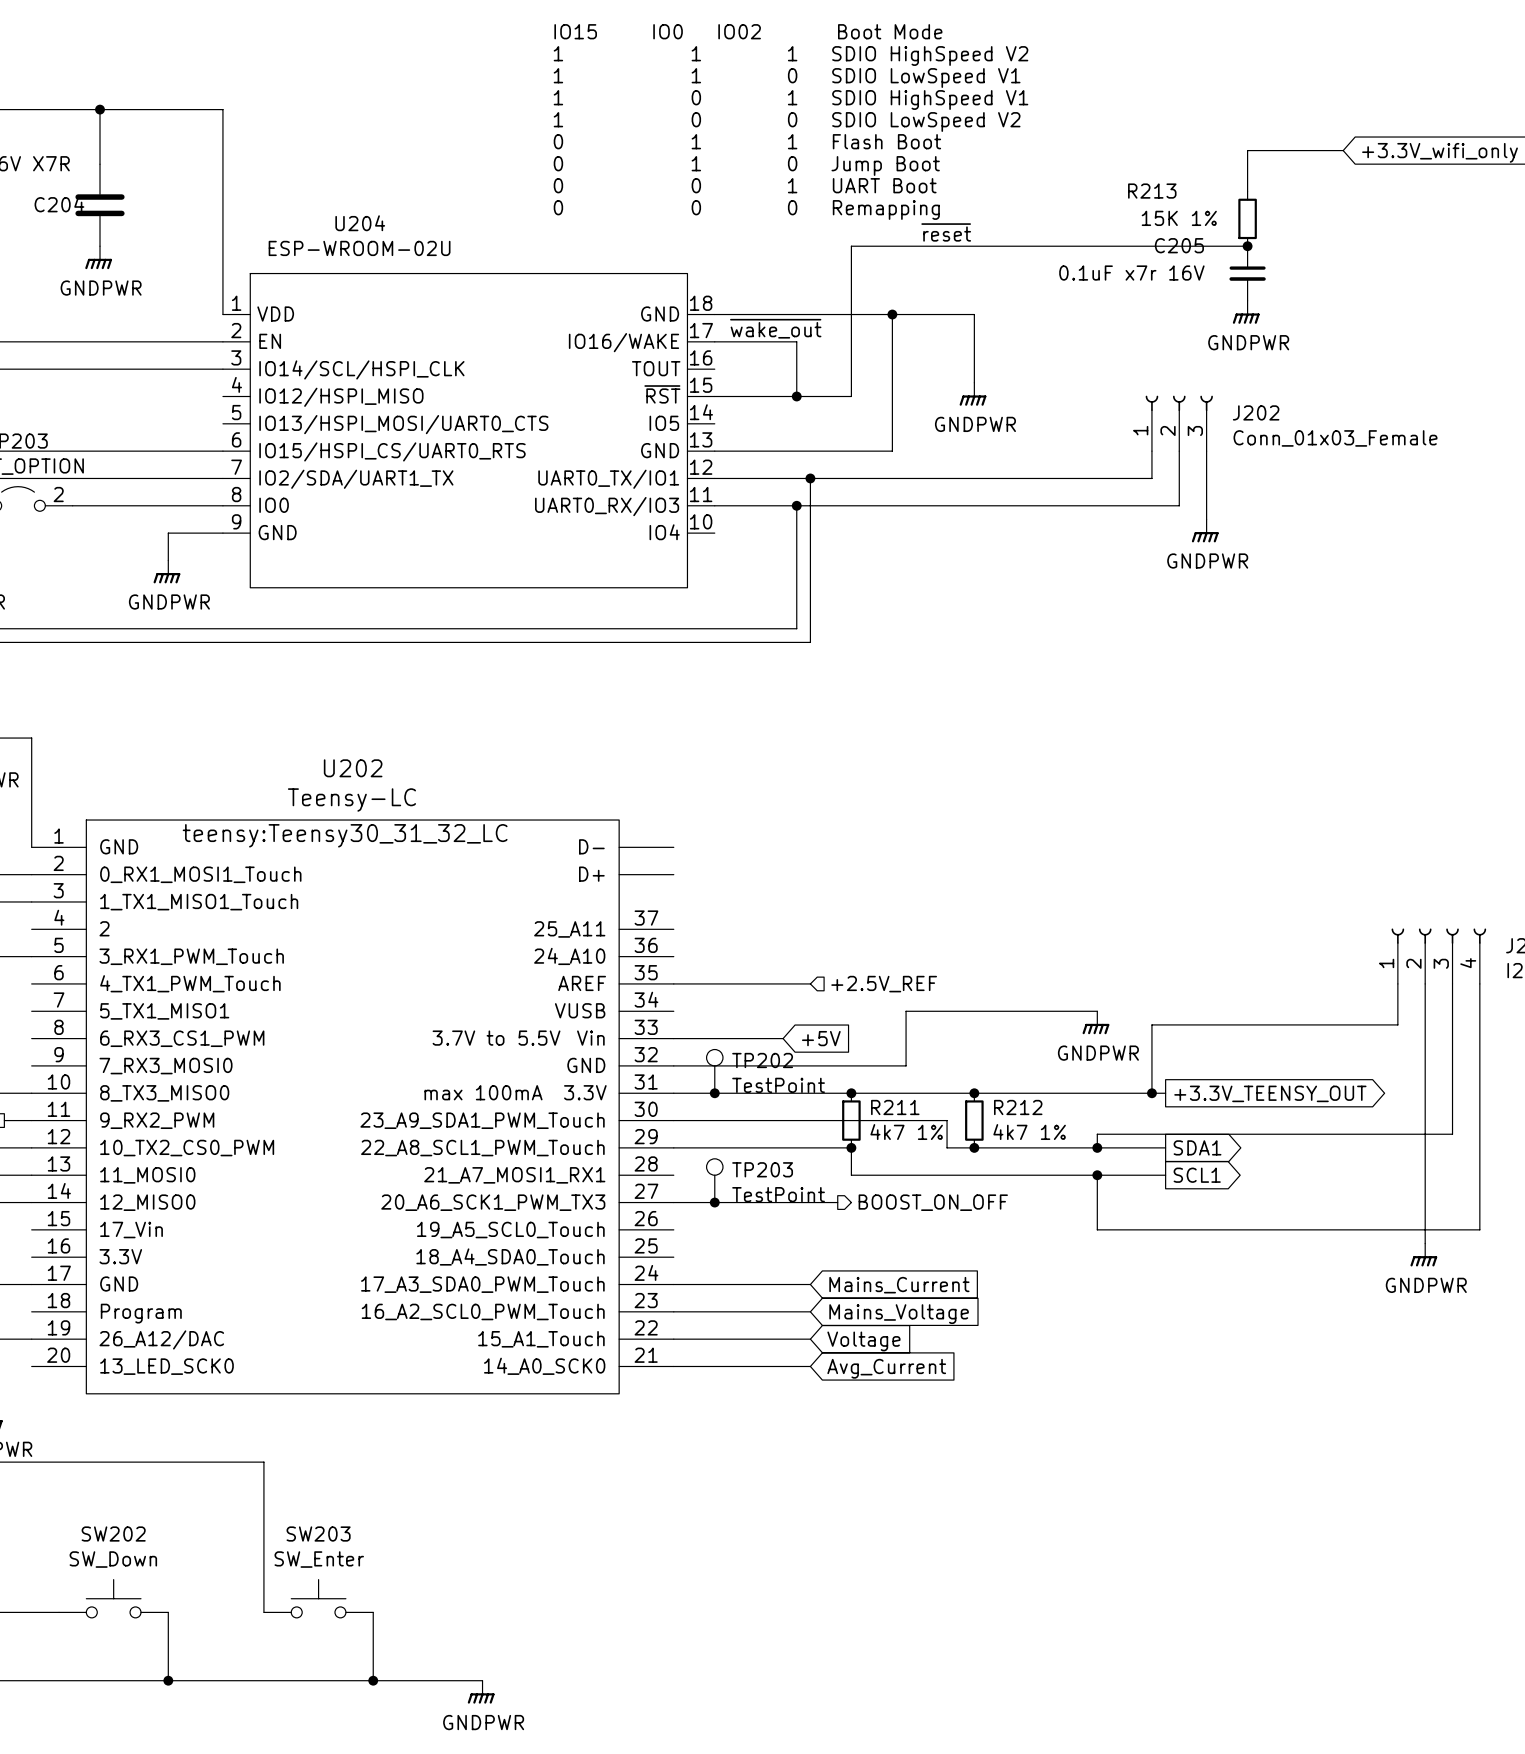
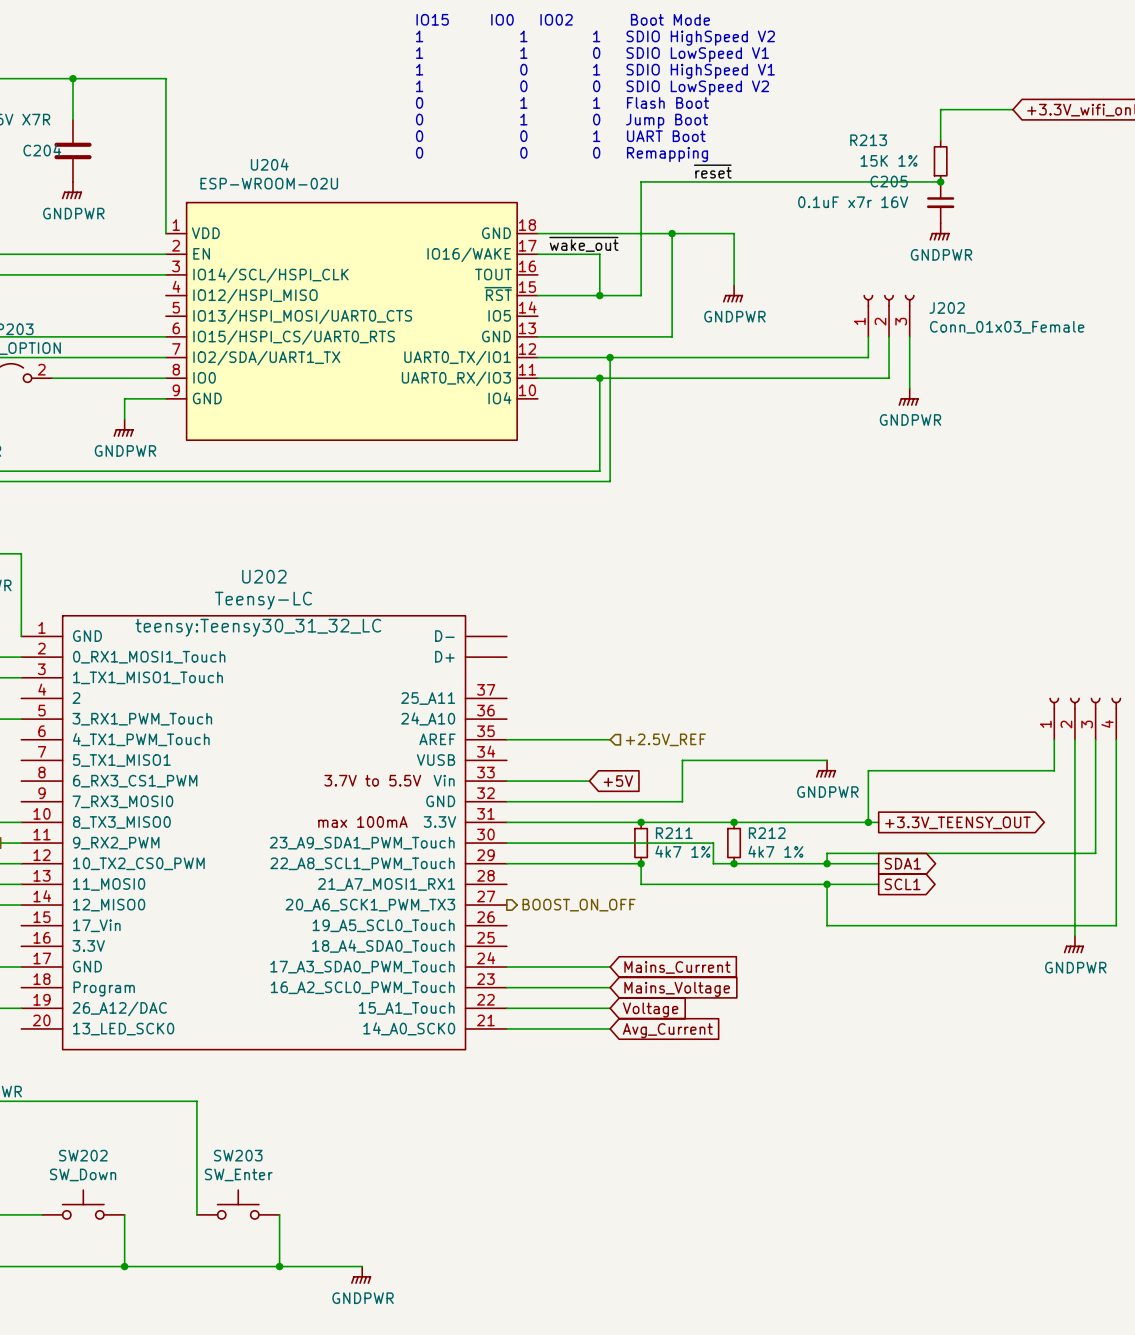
TP202: TestPoint (714, 1071) -> none
junction: (714, 1093) -> none
TP203: TestPoint (714, 1180) -> none
wire: (673, 1202) (837, 1202) -> none
junction: (714, 1202) -> none
hierarchical label position: BOOST_ON_OFF (933, 1202) -> BOOST_ON_OFF (579, 905)

